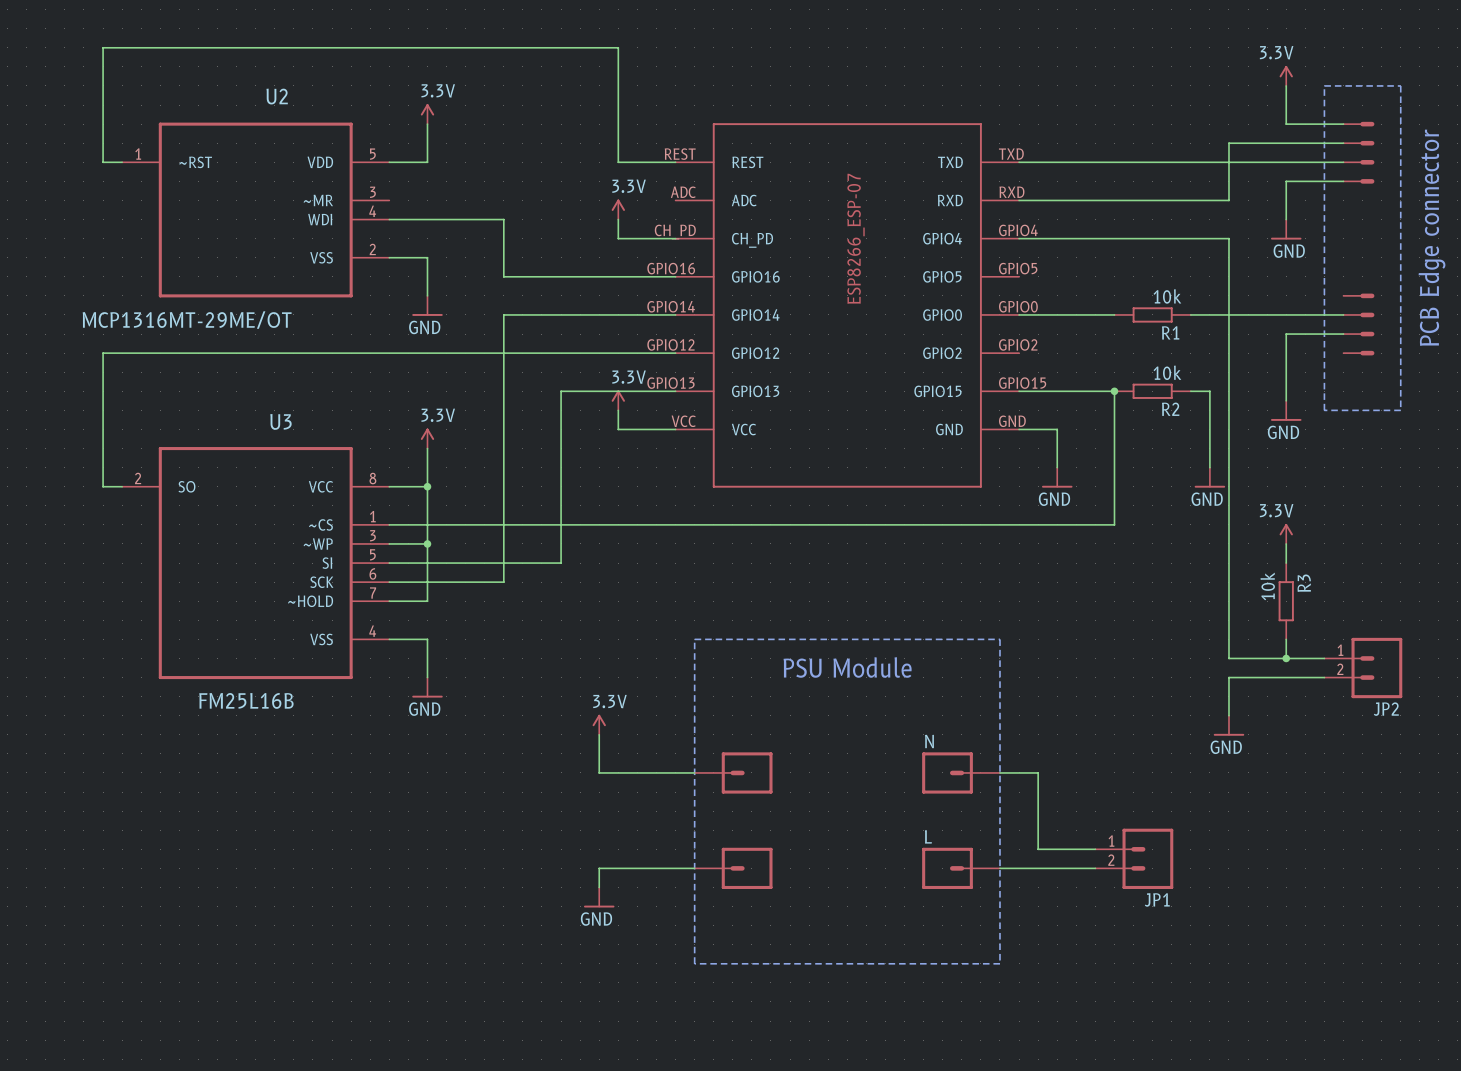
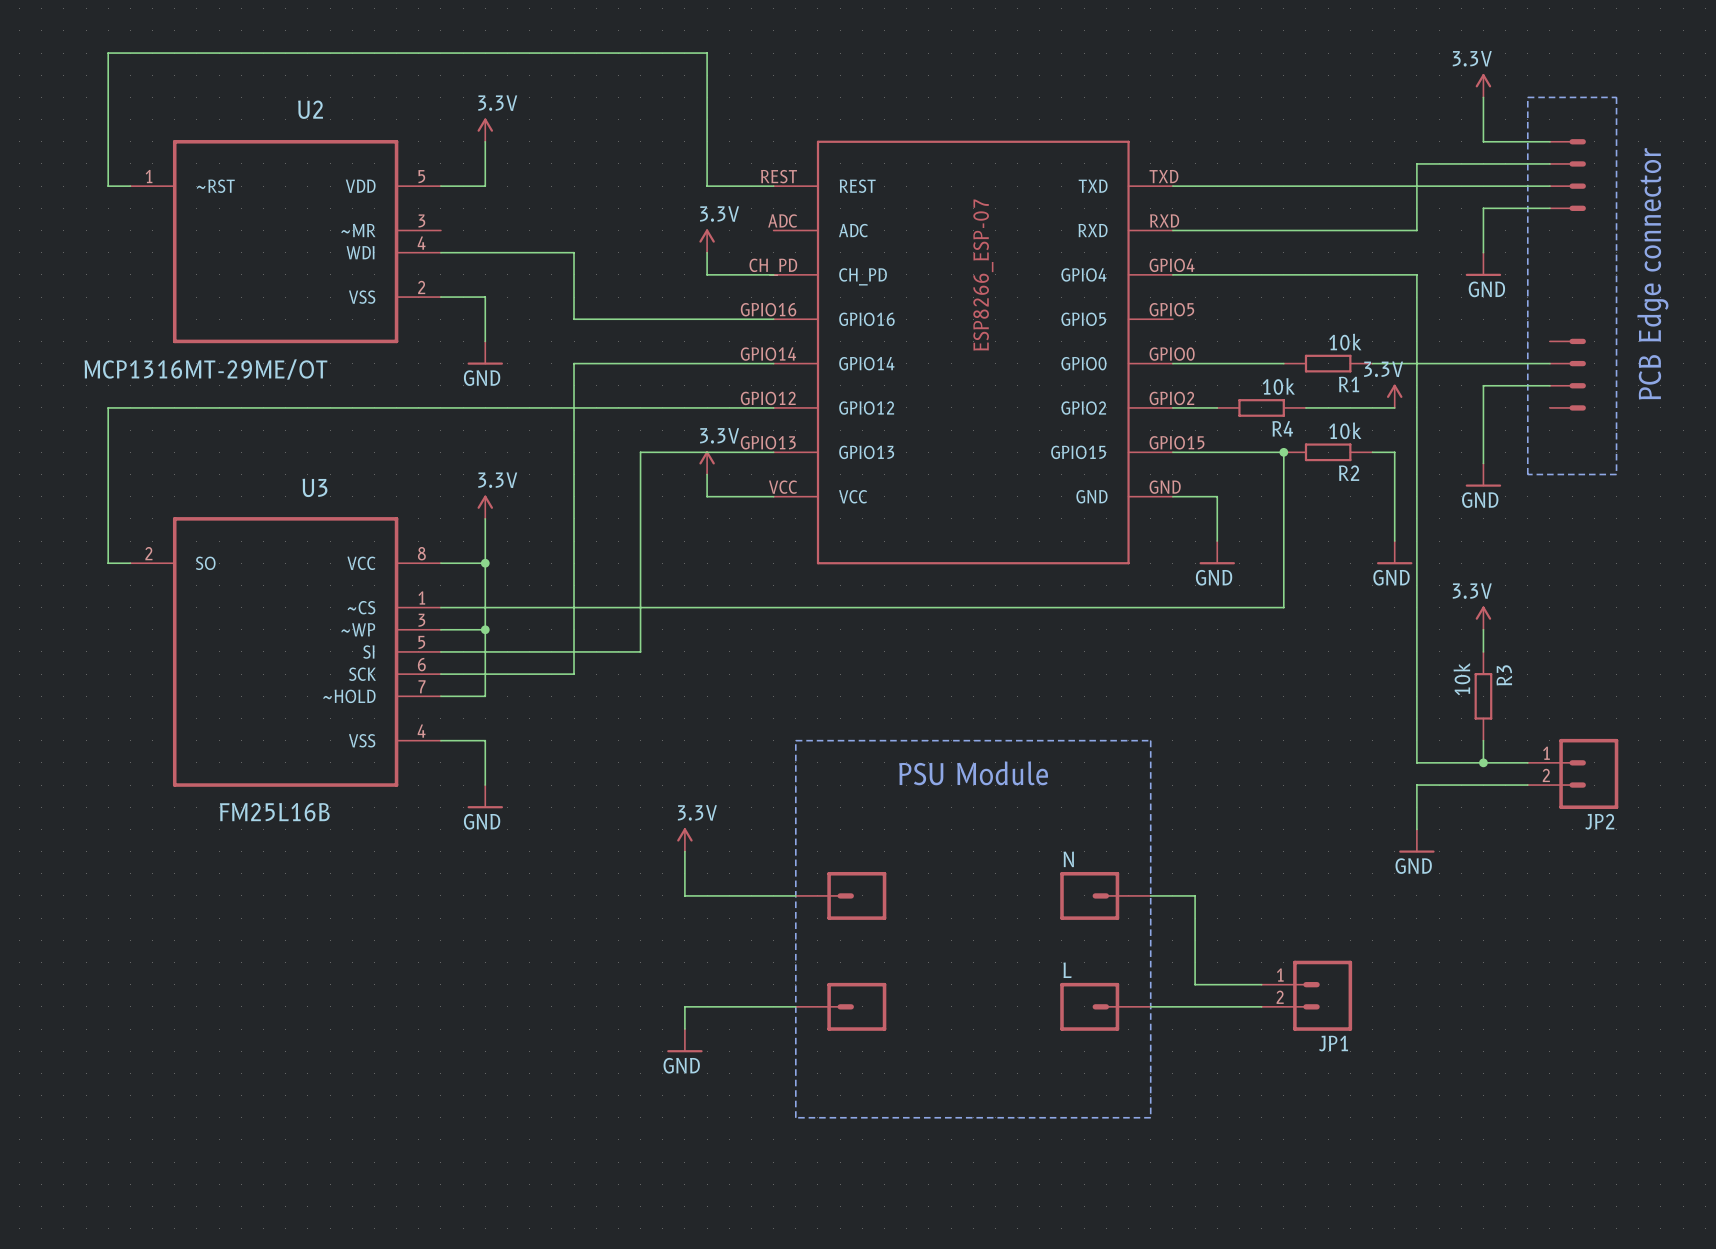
power symbol: none -> 3.3V (1394, 396)
wire: none -> (1172, 407) (1217, 407)
R4: none -> 10k (1261, 407)
wire: none -> (1305, 407) (1394, 407)

